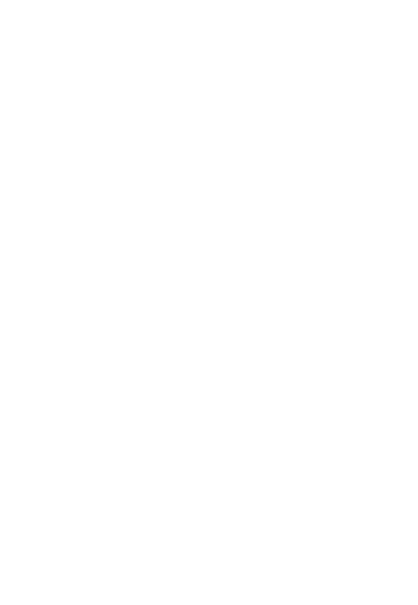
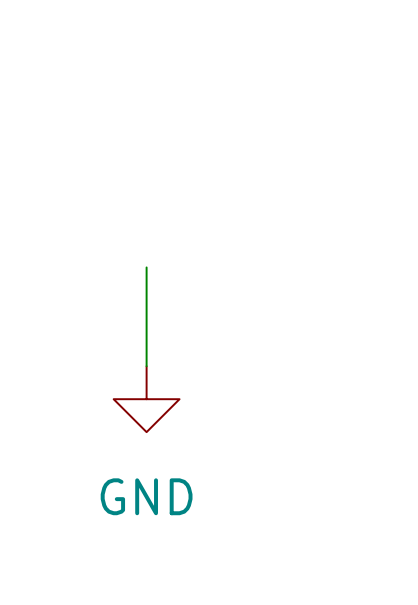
wire: none -> (146, 267) (146, 366)
power symbol: none -> GND (146, 399)

